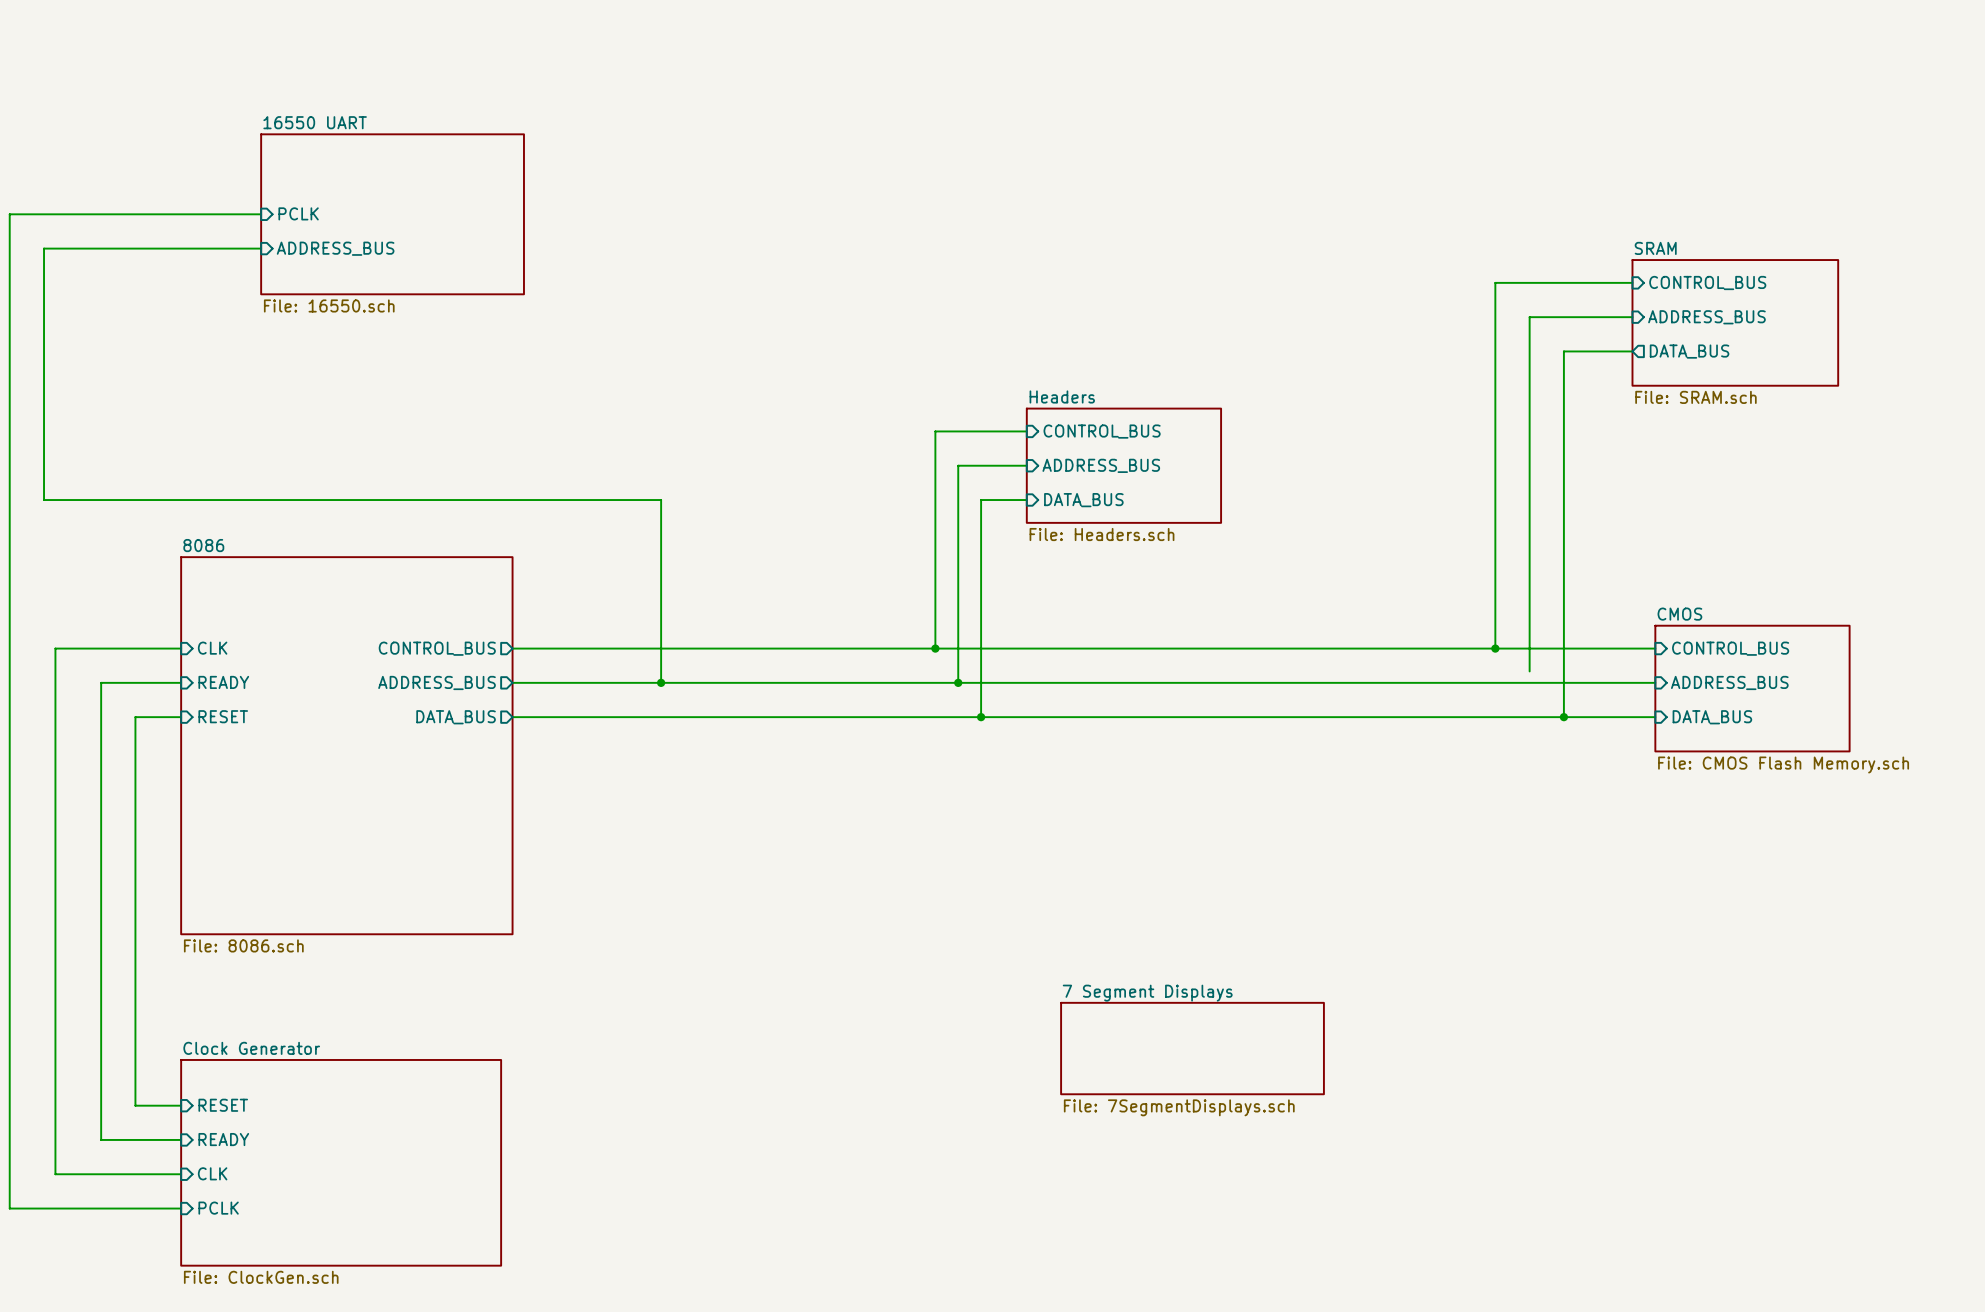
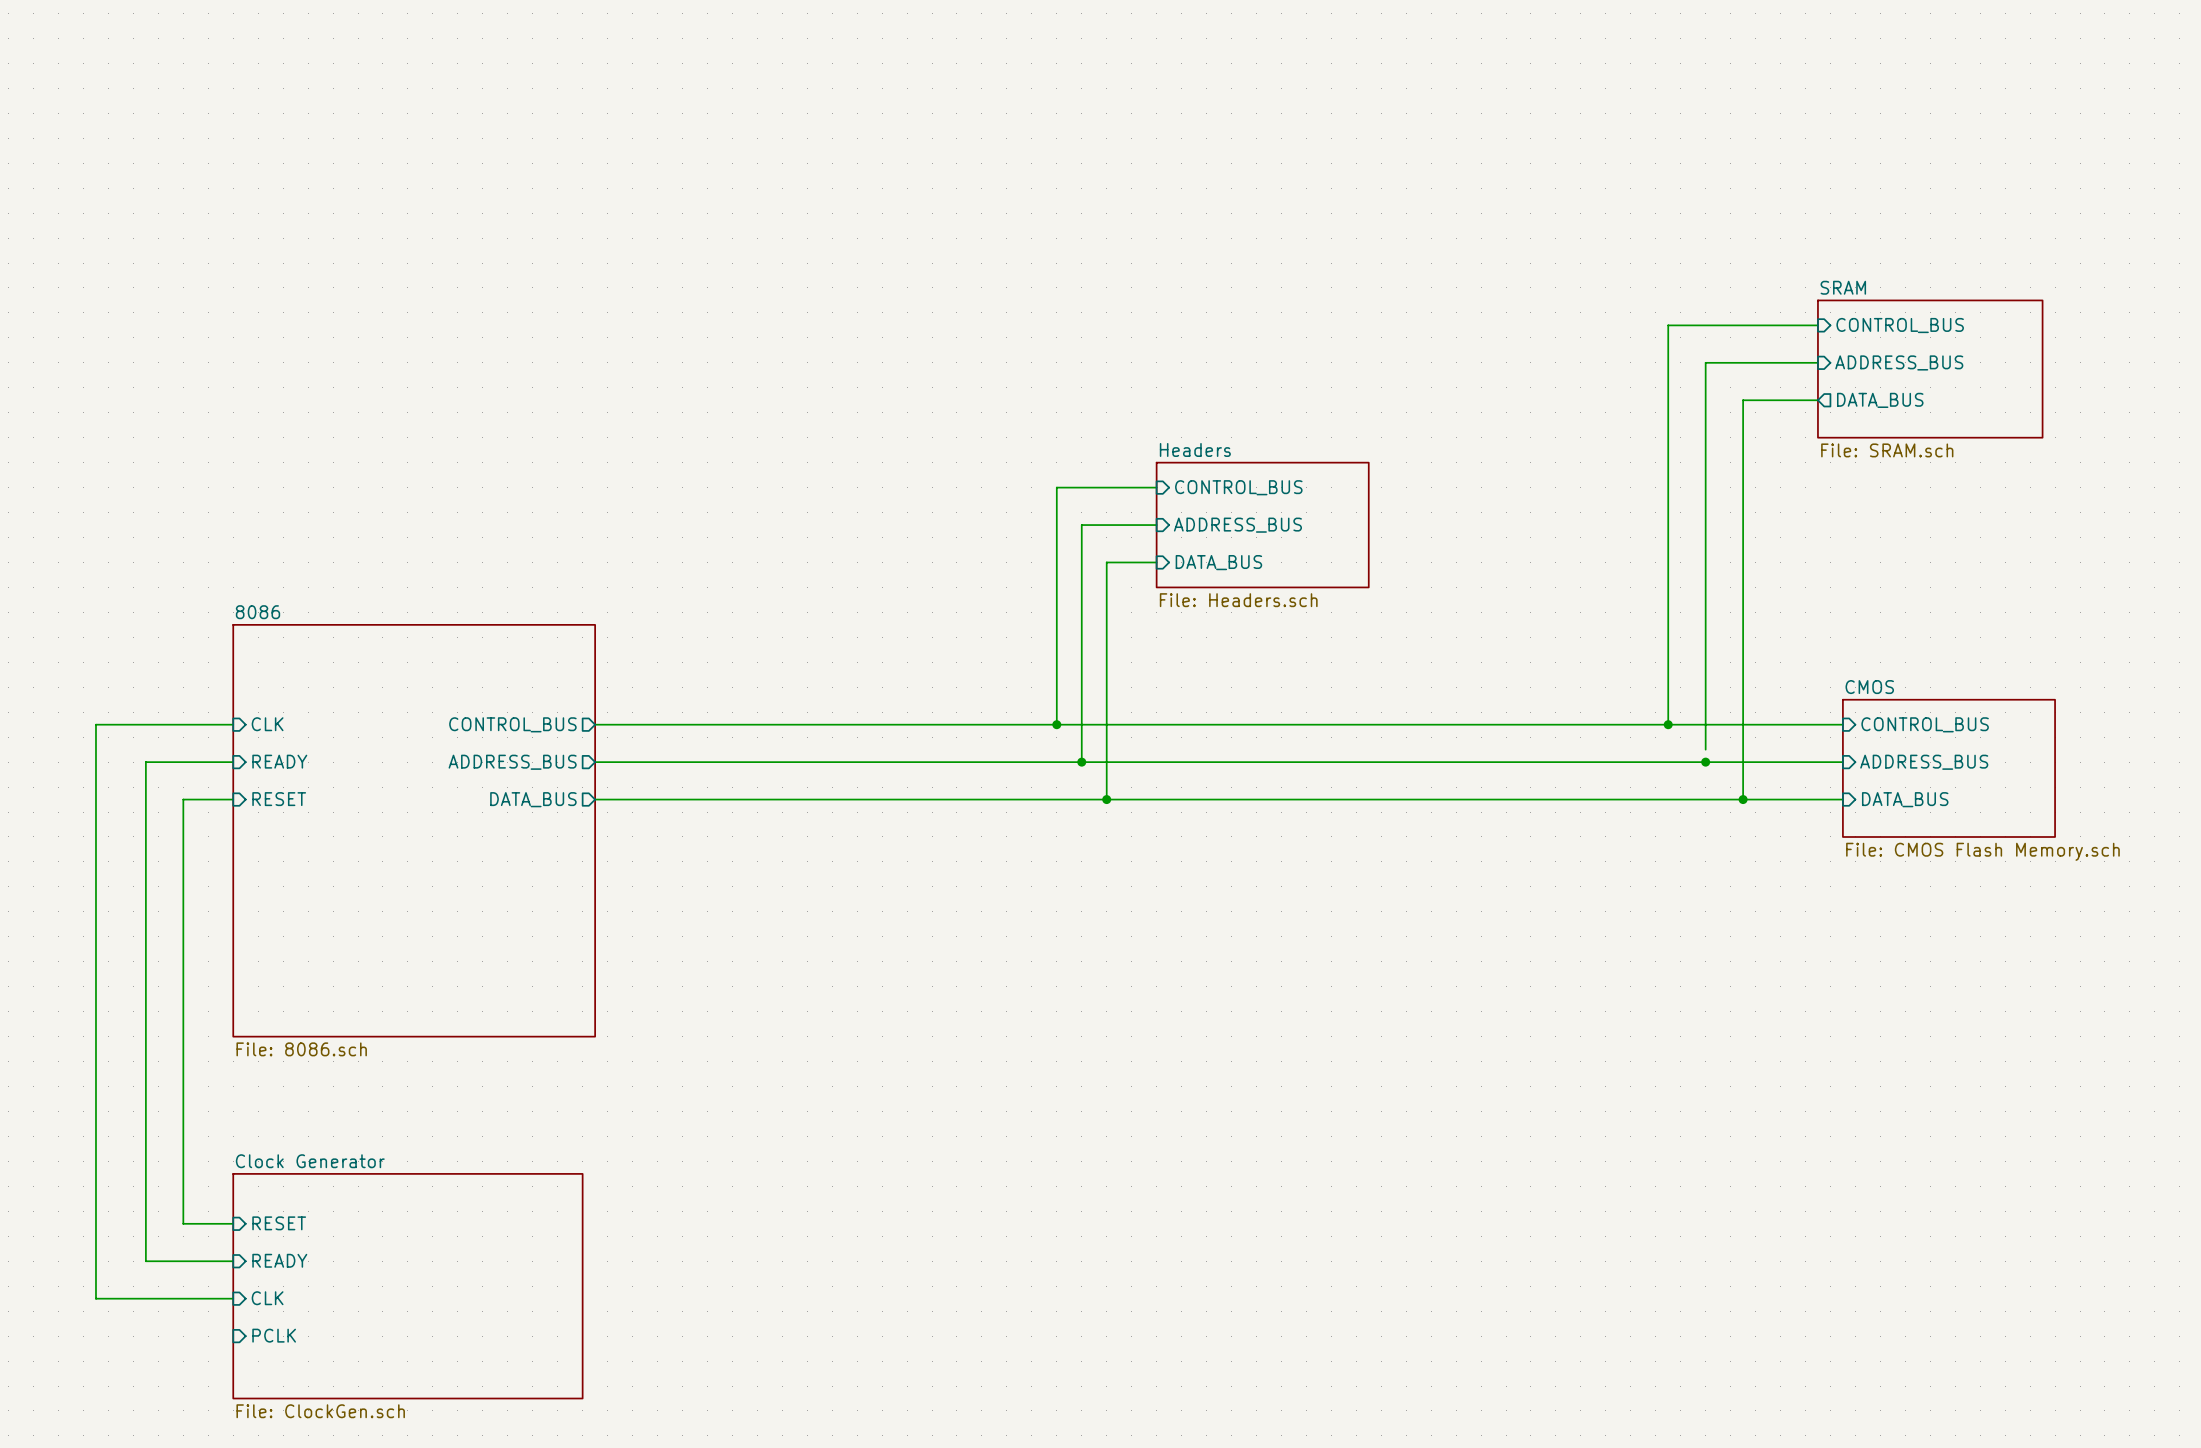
sheet pin: PCLK (298, 213) -> none
wire: (261, 214) (9, 214) (9, 1208) (181, 1208) -> none
sheet 16550 UART: File: 16550.sch (392, 214) -> none
wire: (261, 248) (44, 248) (44, 500) (661, 500) (661, 682) -> none
sheet pin: ADDRESS_BUS (335, 248) -> none
junction: (661, 682) -> none
junction: none -> (1705, 762)
sheet 7 Segment Displays: File: 7SegmentDisplays.sch (1192, 1048) -> none

